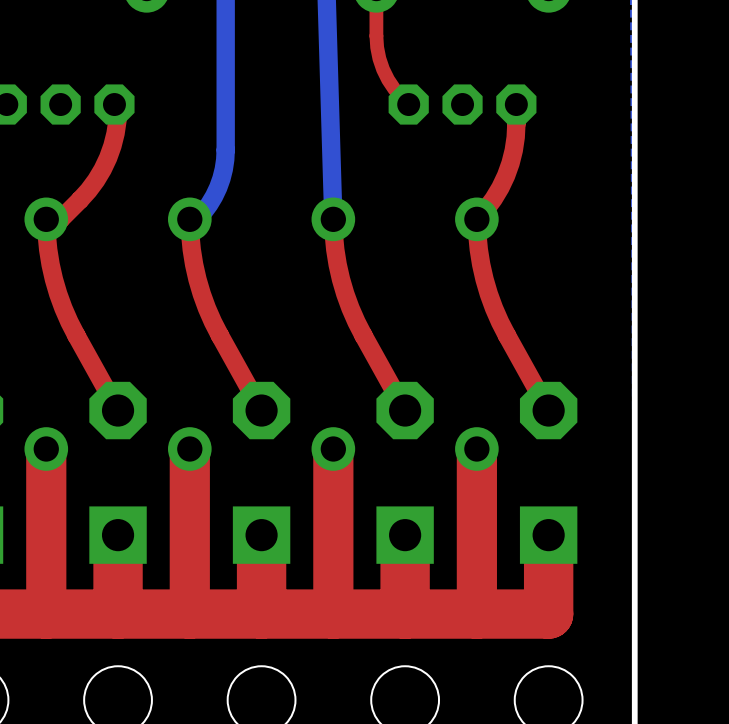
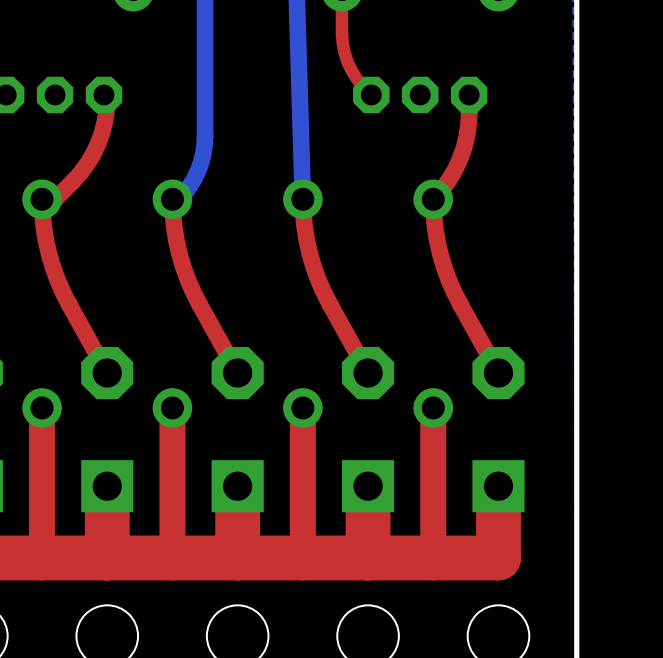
top track width: thick (46, 449) (46, 614) -> thin (42, 407) (42, 557)
top track width: thick (189, 449) (189, 614) -> thin (172, 407) (172, 557)
top track width: thick (333, 449) (333, 614) -> thin (302, 407) (302, 557)
top track width: thick (476, 449) (476, 614) -> thin (433, 407) (433, 557)

